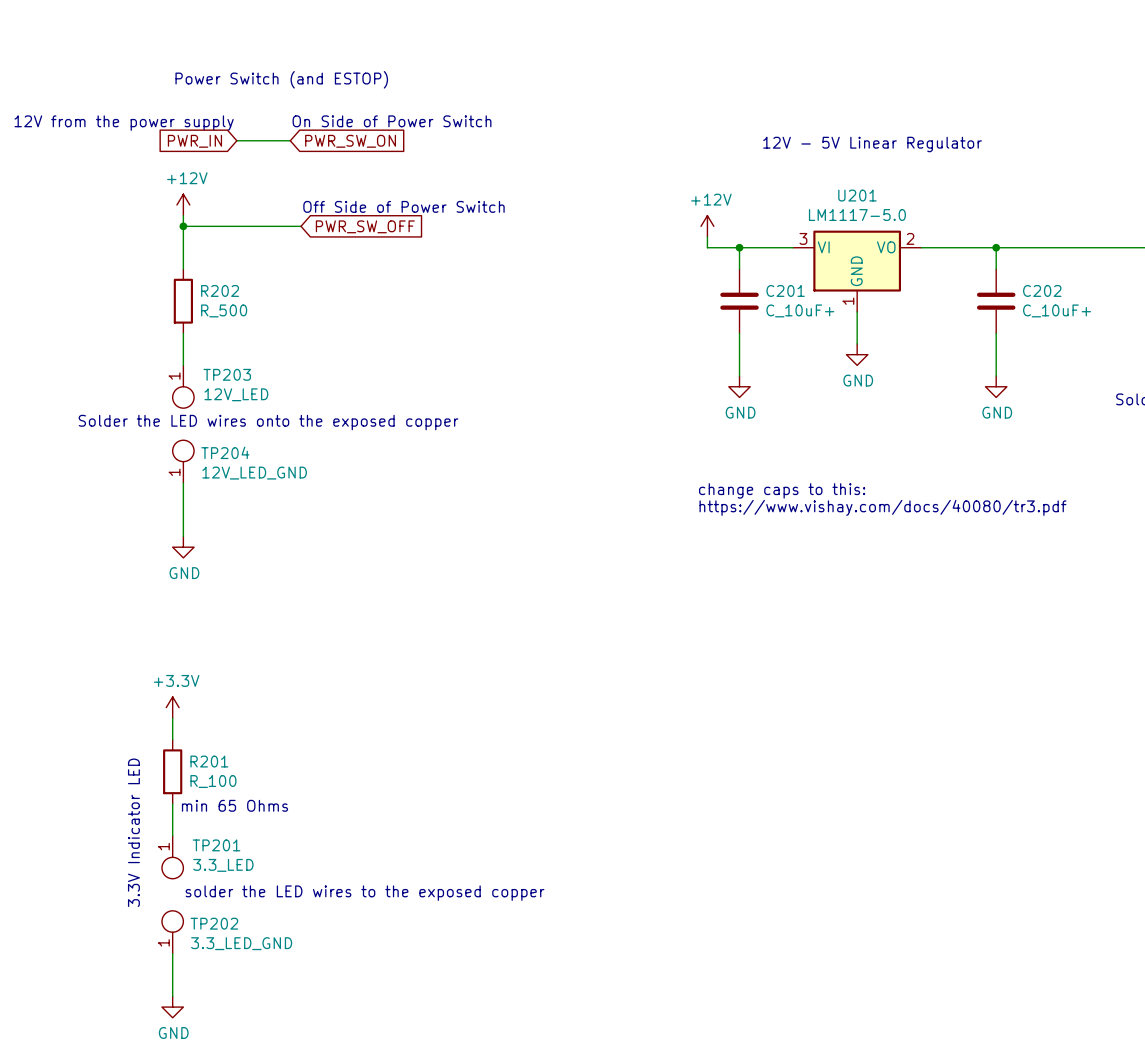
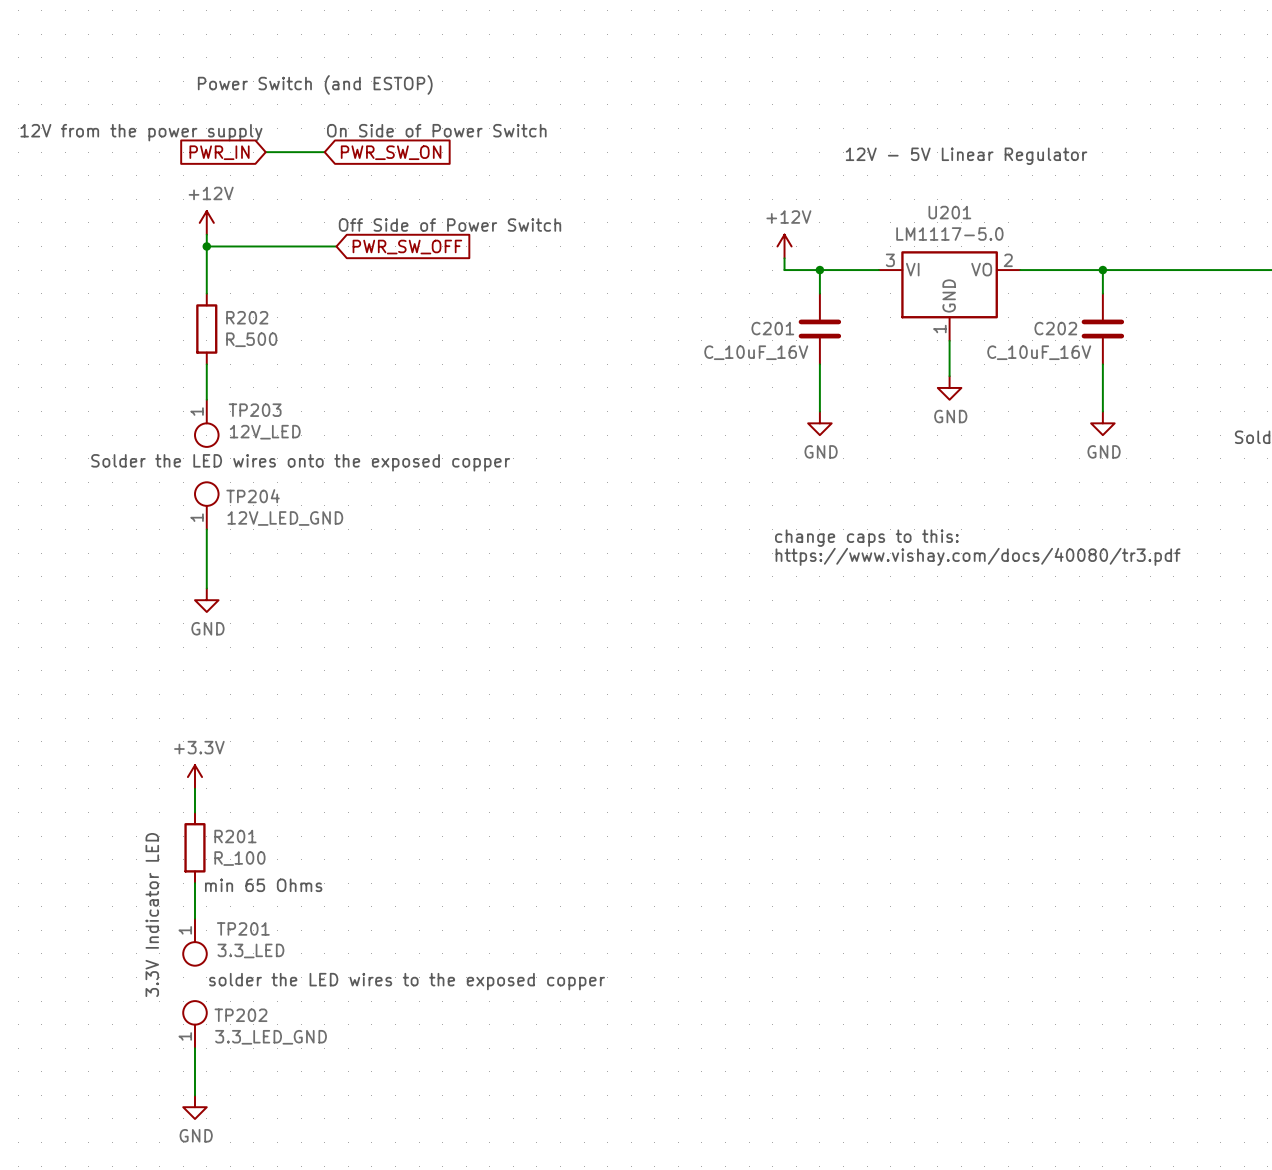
C201 name position: C201 (785, 290) -> C201 (772, 328)
C202 name position: C202 (1042, 290) -> C202 (1055, 328)
C201 value: C_10uF+ (800, 310) -> C_10uF_16V (756, 352)
C202 value: C_10uF+ (1057, 310) -> C_10uF_16V (1039, 352)

